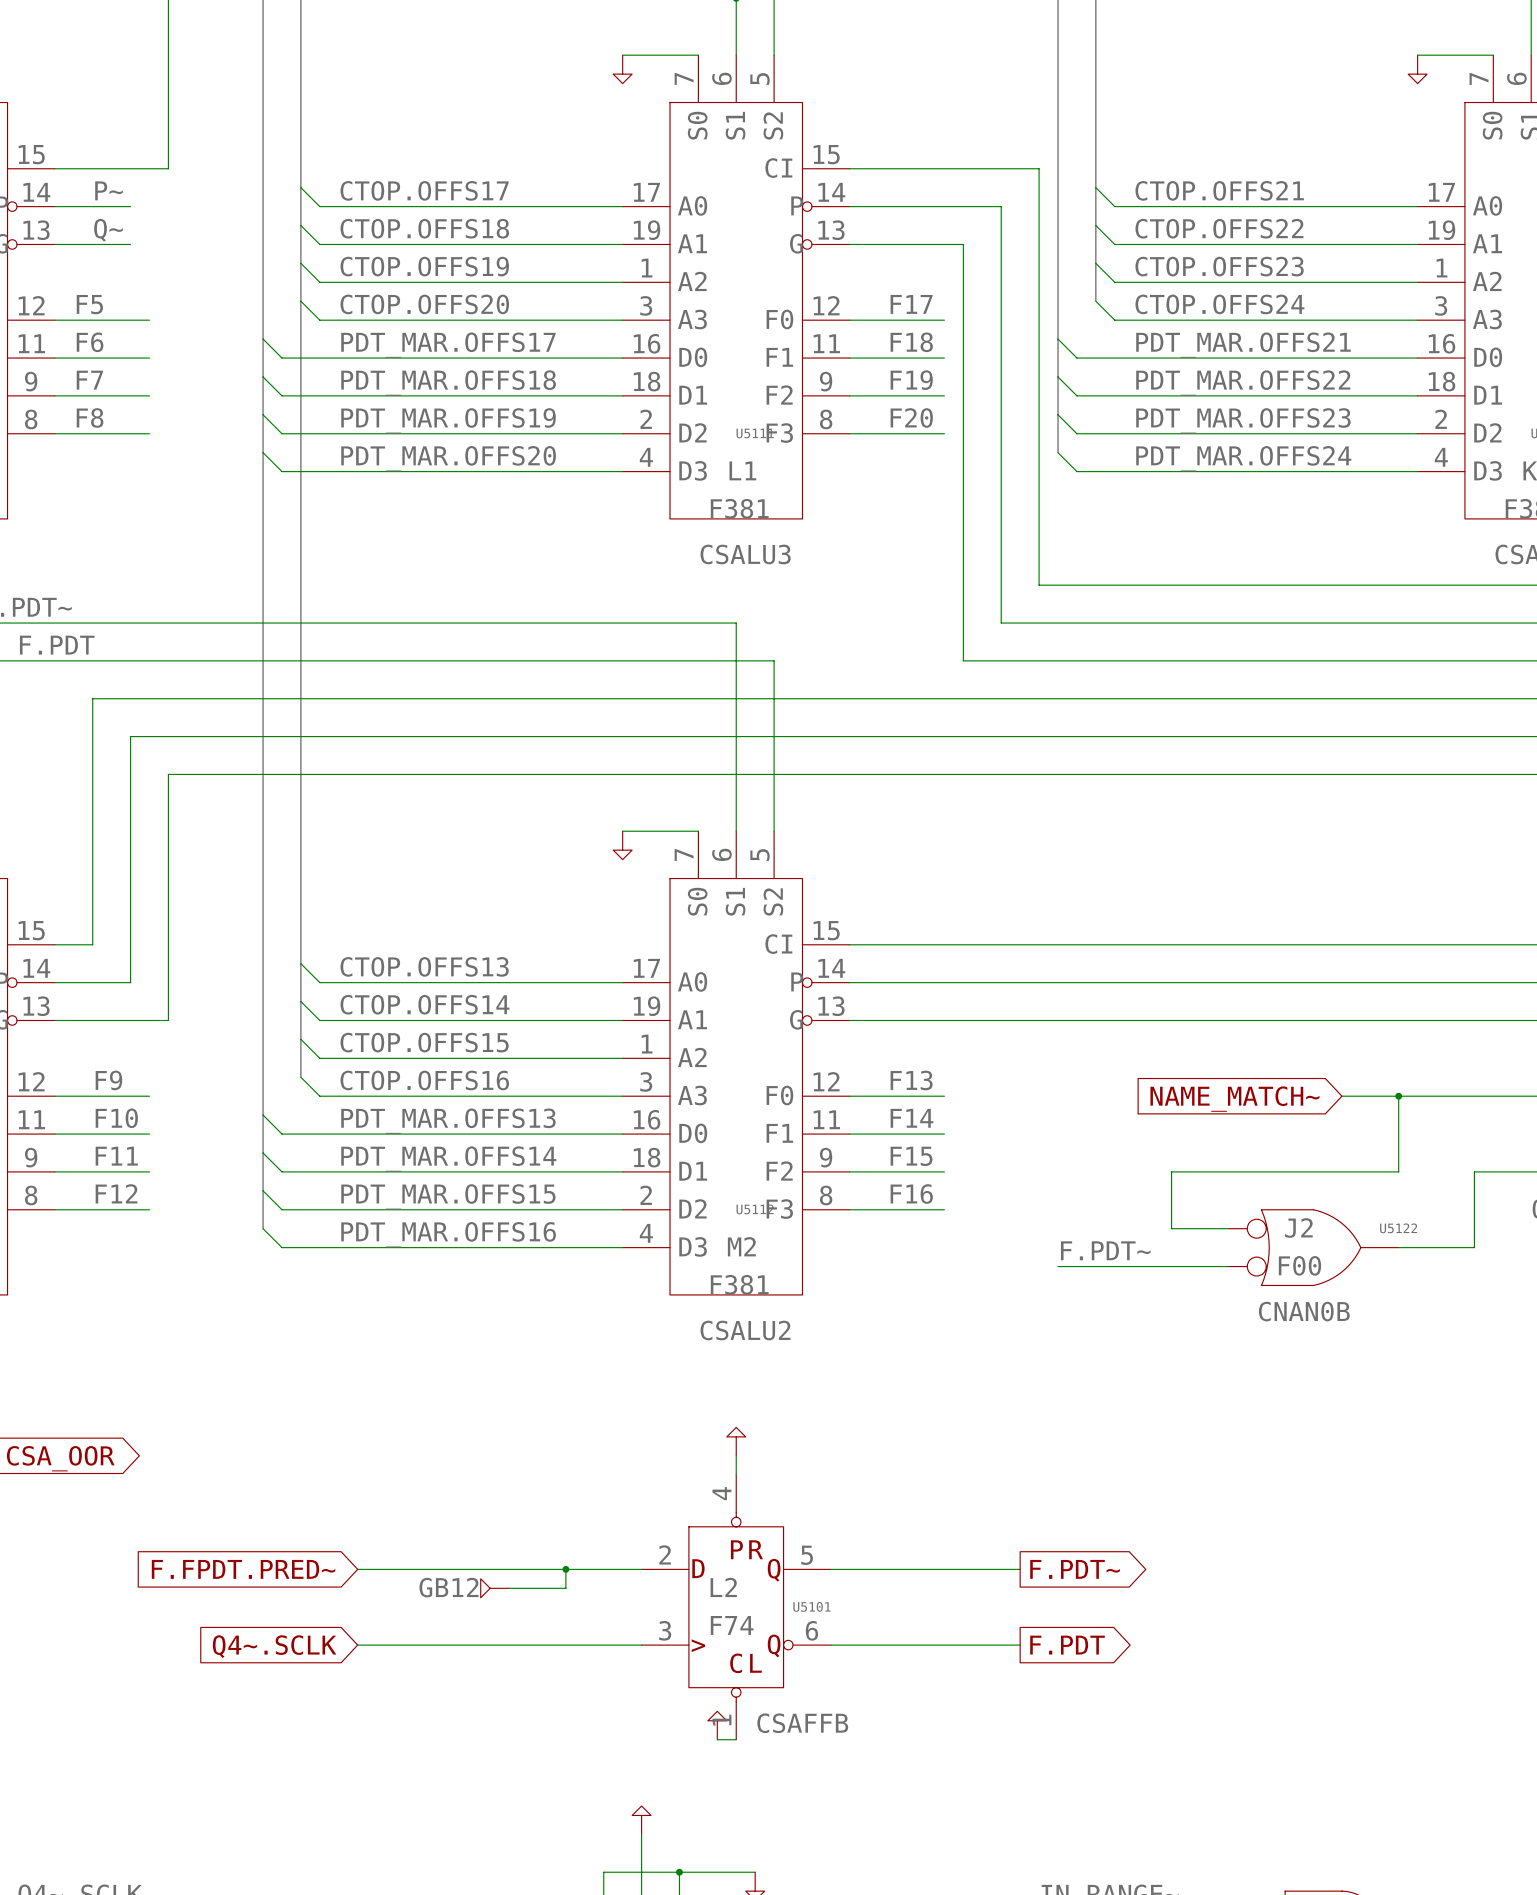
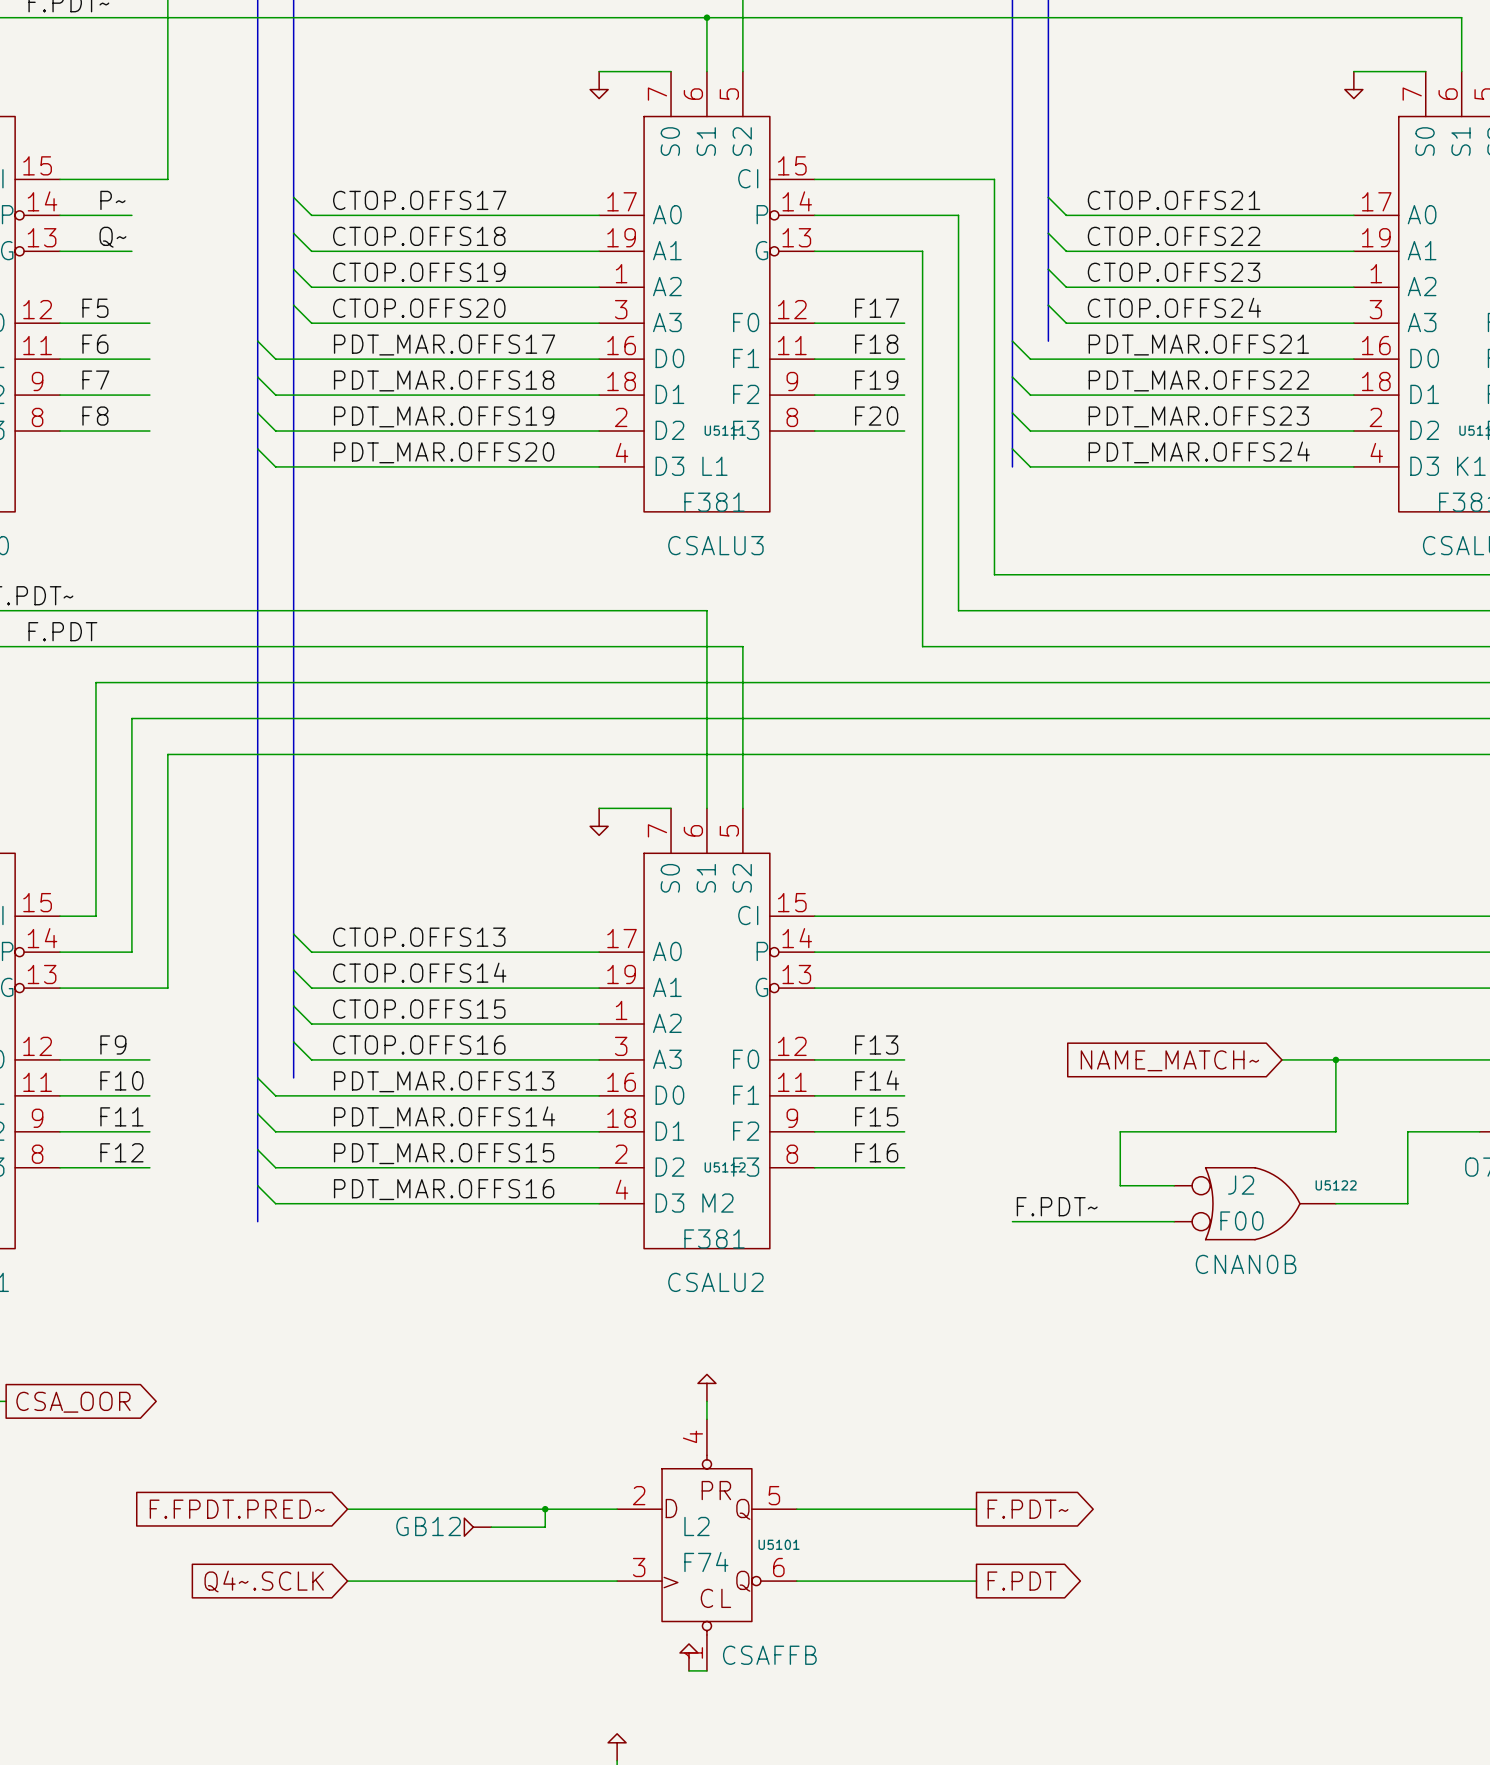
bus: none -> (1048, 305) (1048, 341)
bus: none -> (1012, 448) (1012, 466)
bus: none -> (293, 1041) (293, 1077)
bus: none -> (257, 1185) (257, 1221)

